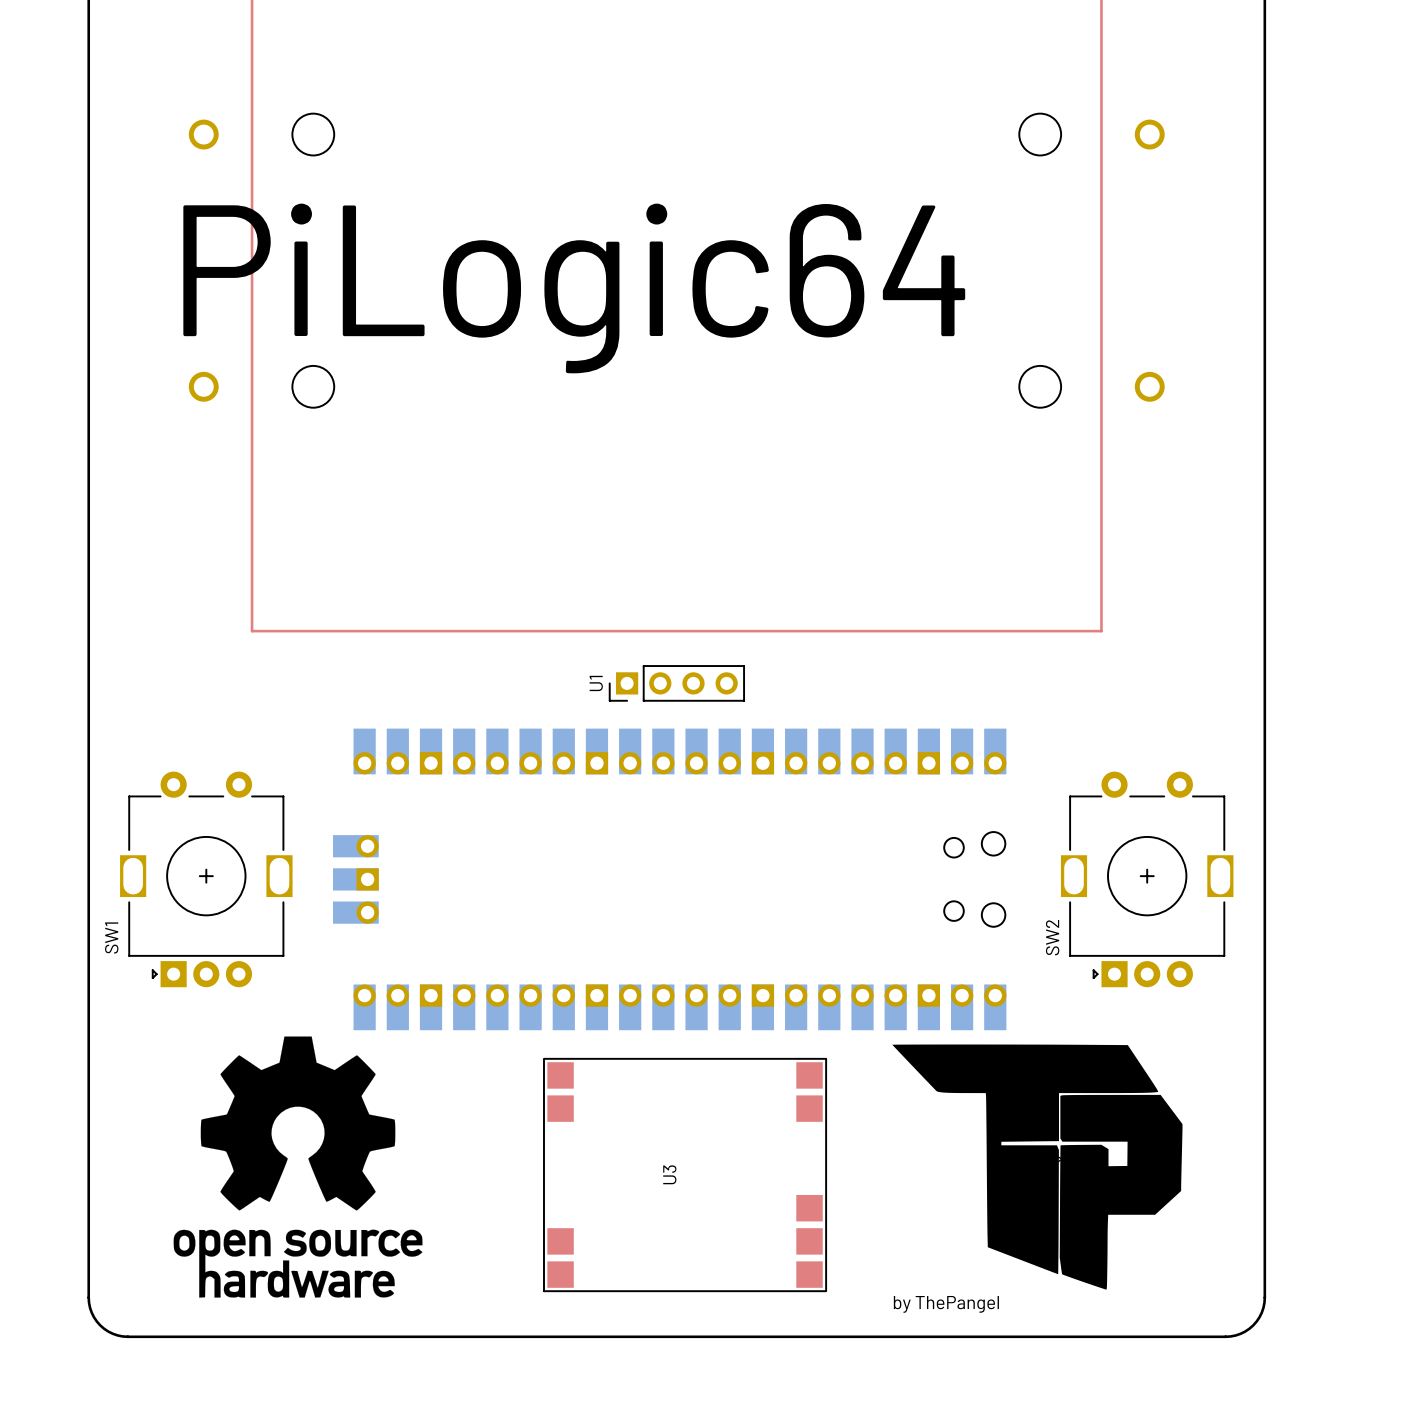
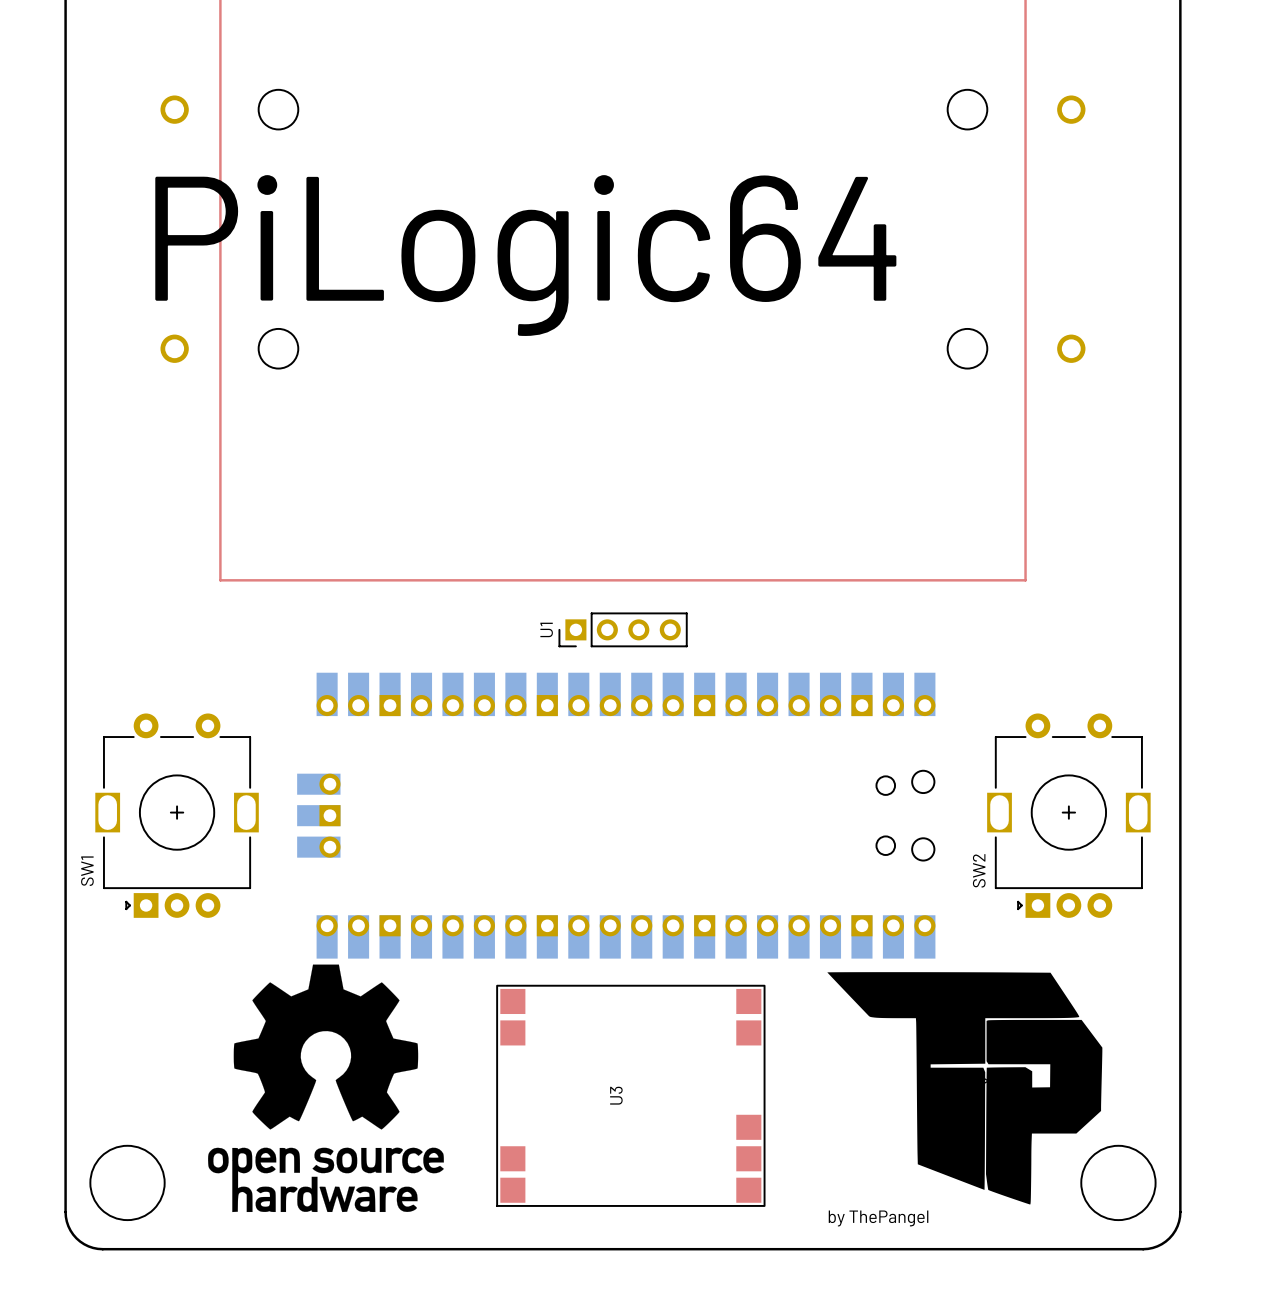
drawing position: (298, 1167) -> (325, 1088)
round board edge: none -> [89, 1145, 166, 1221]
round board edge: none -> [1080, 1145, 1157, 1221]

